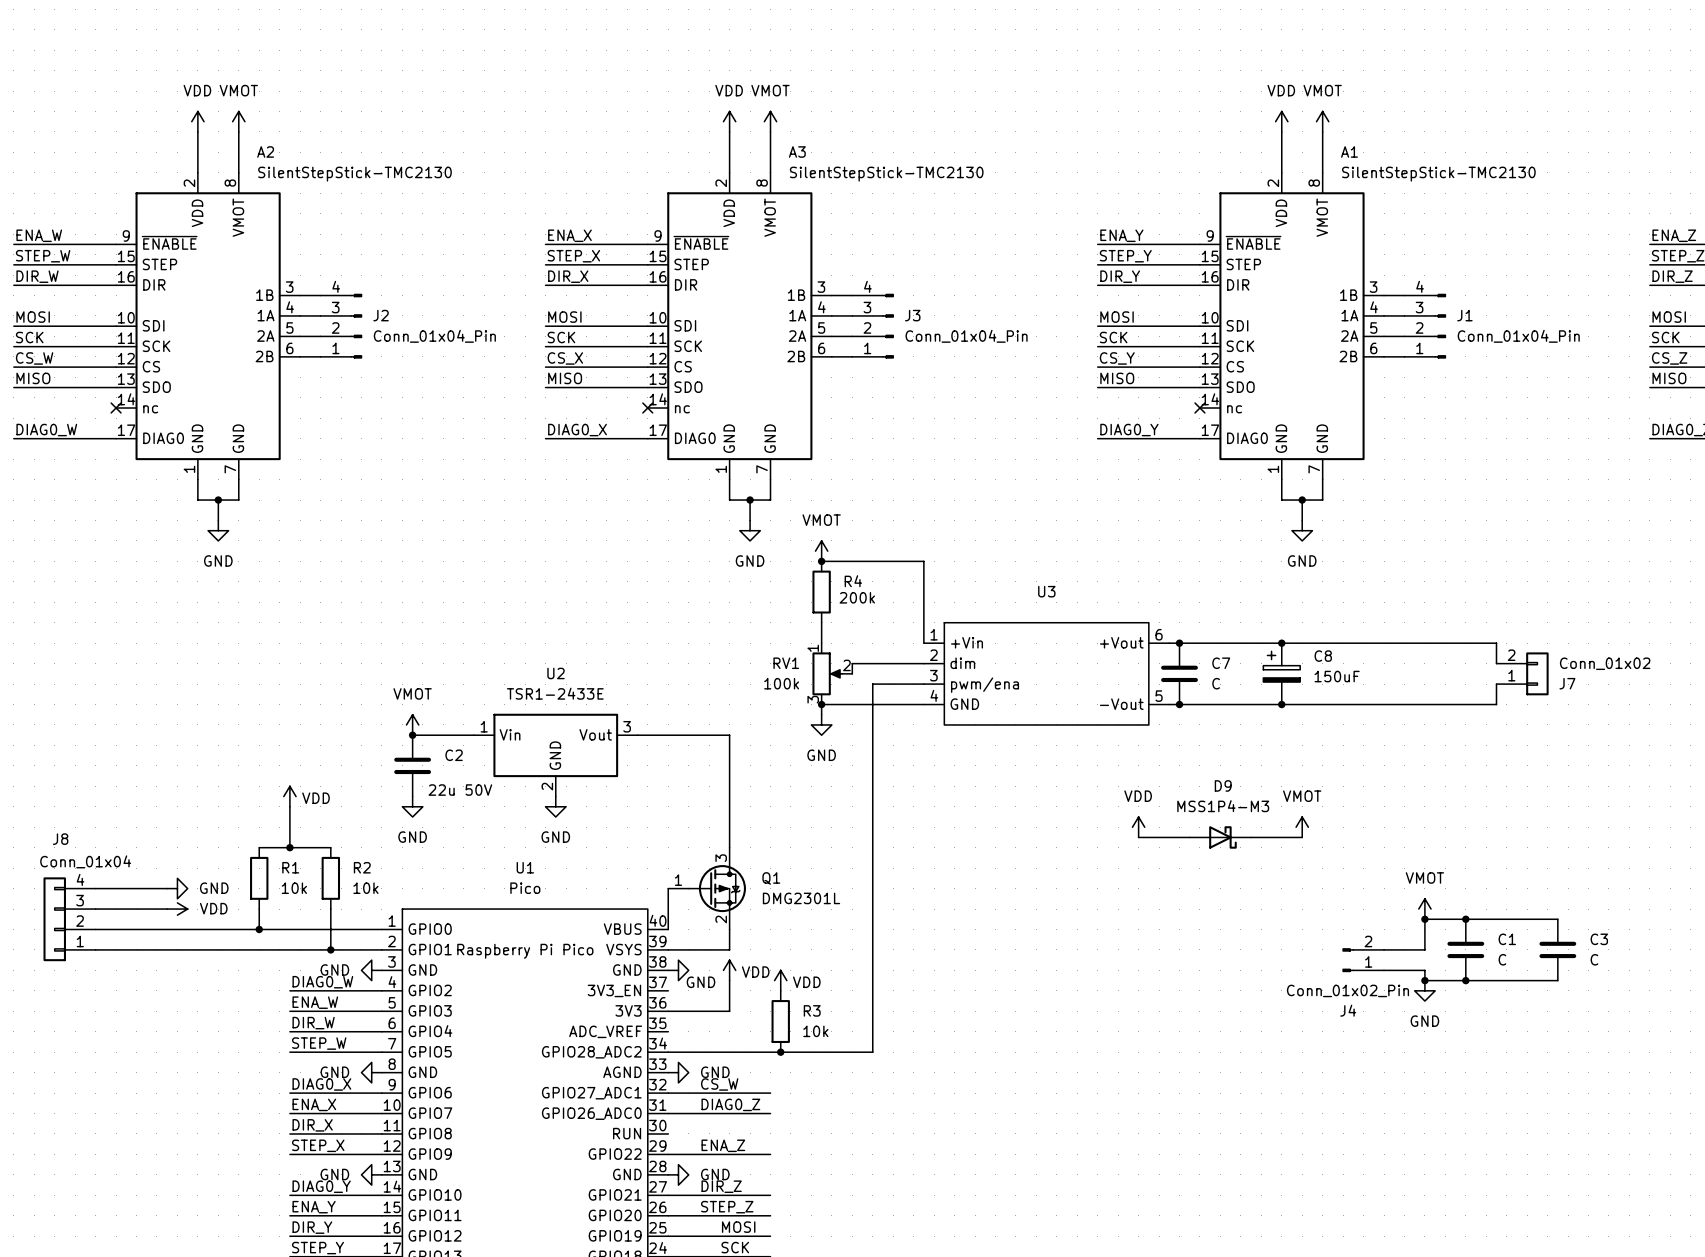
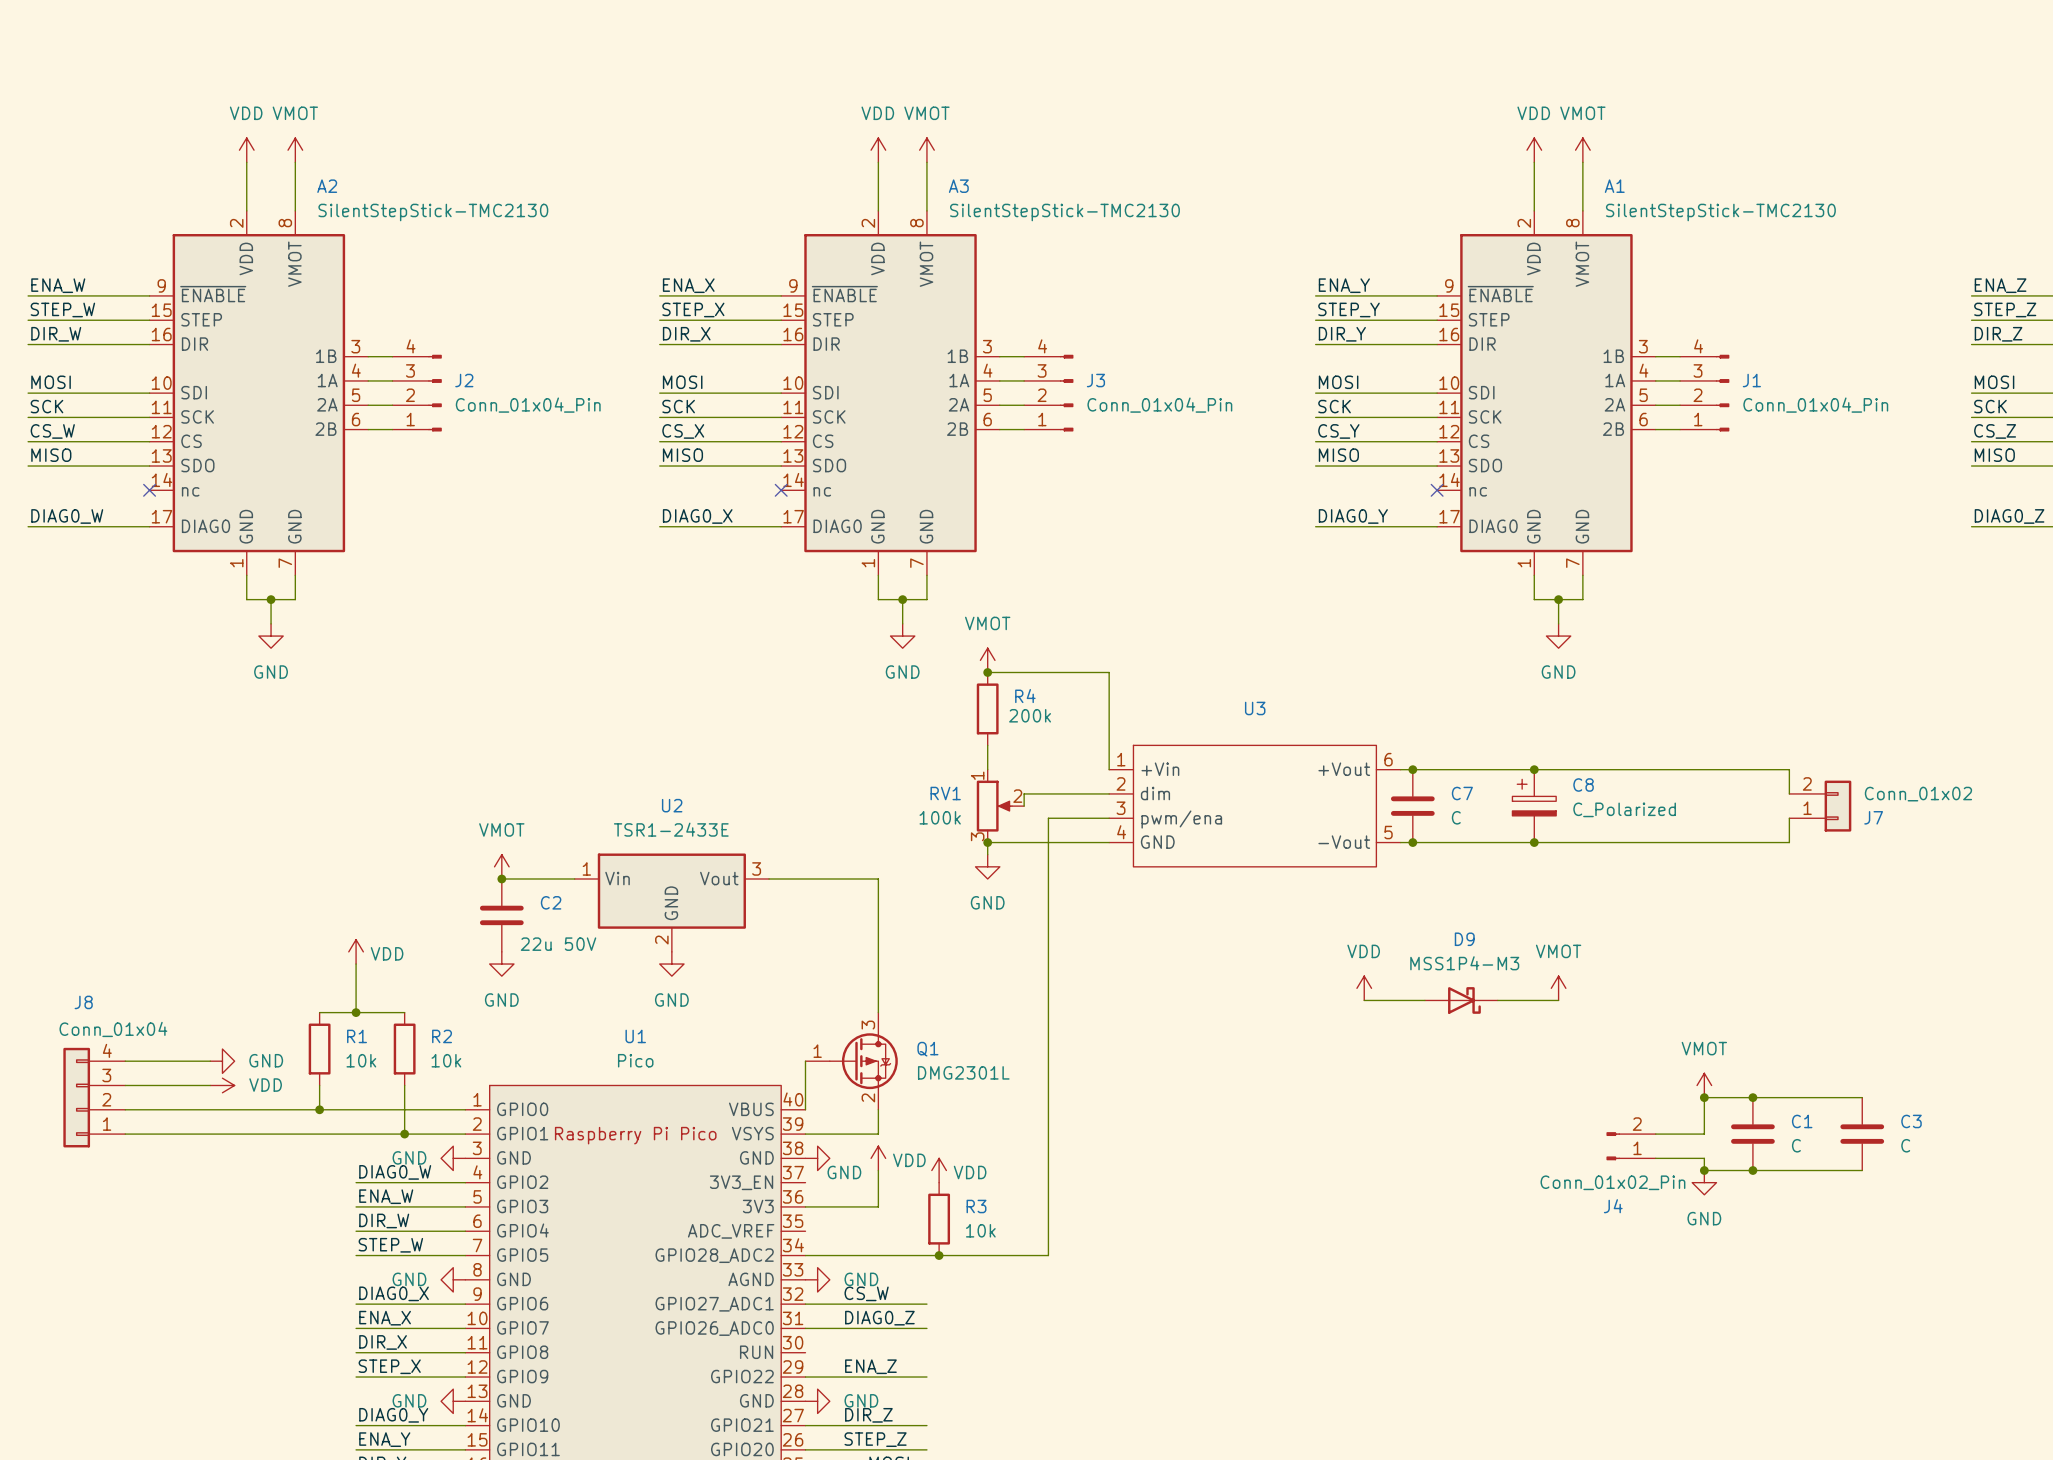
C8 value: 150uF (1337, 676) -> C_Polarized (1624, 809)

